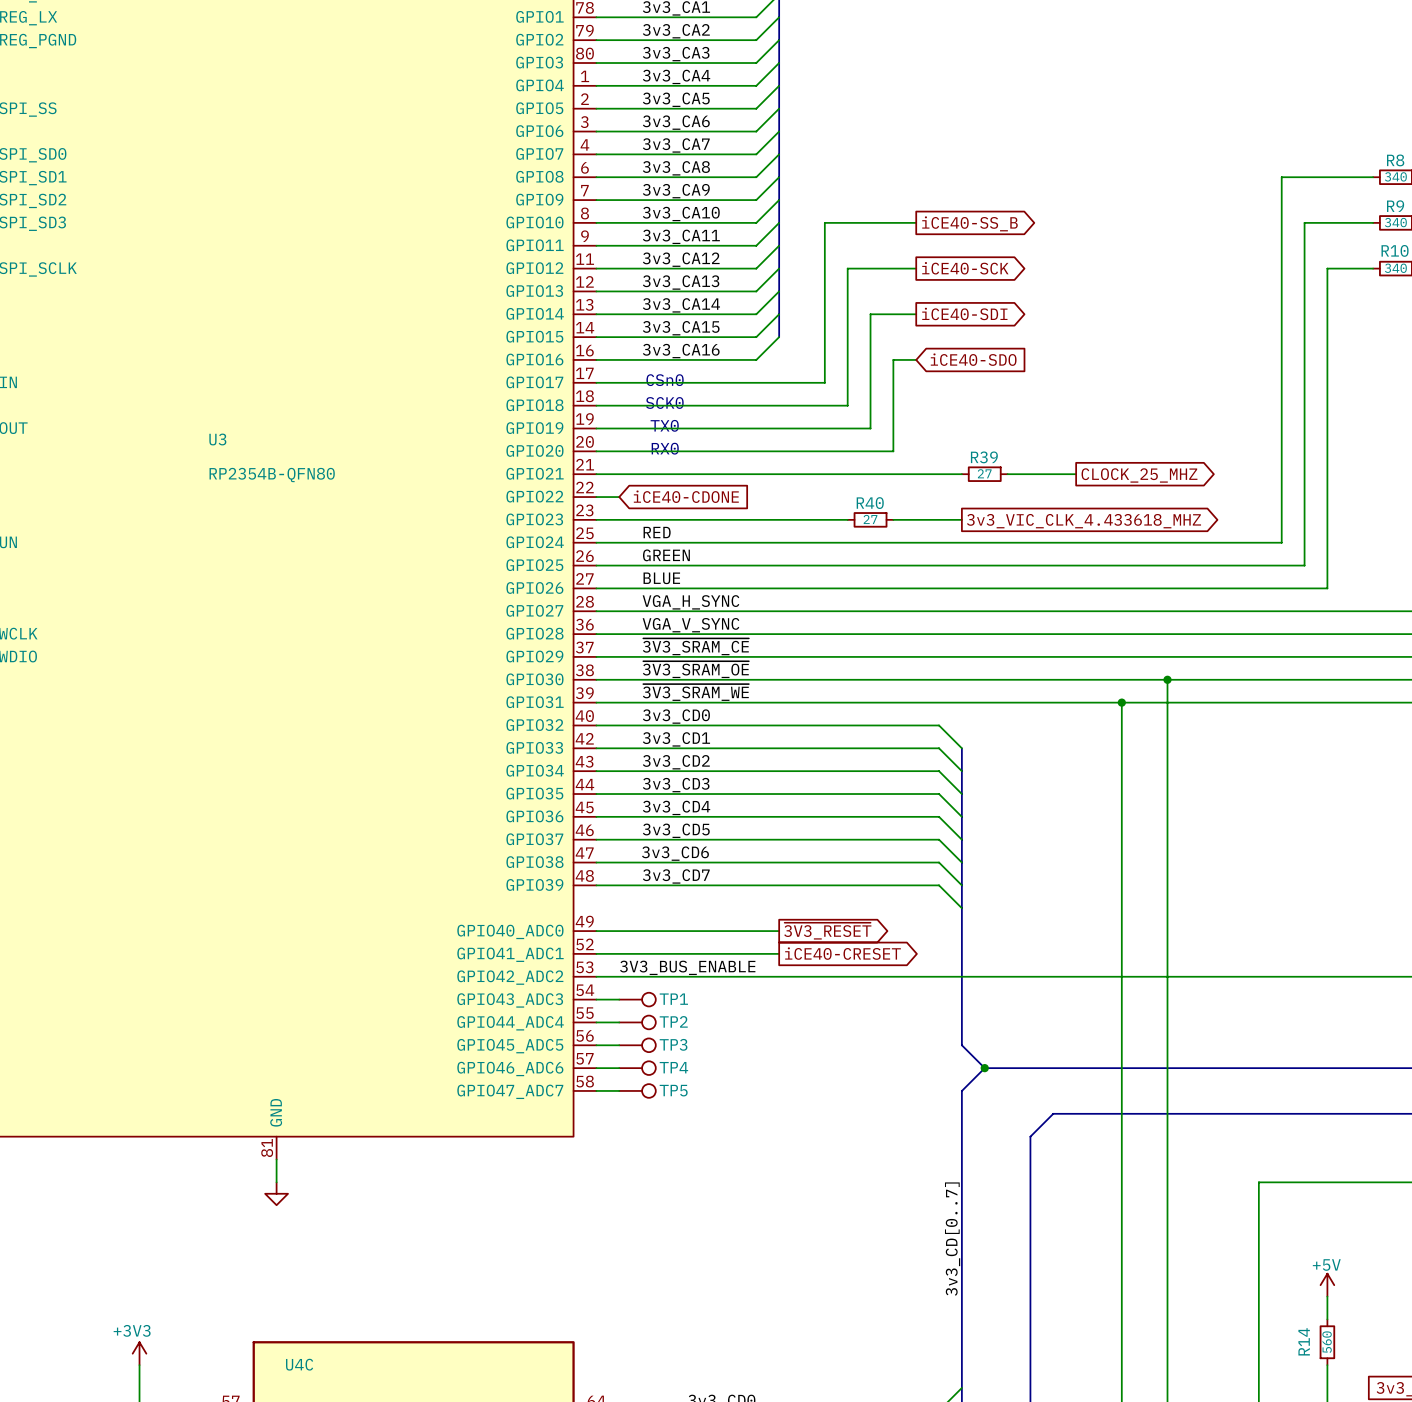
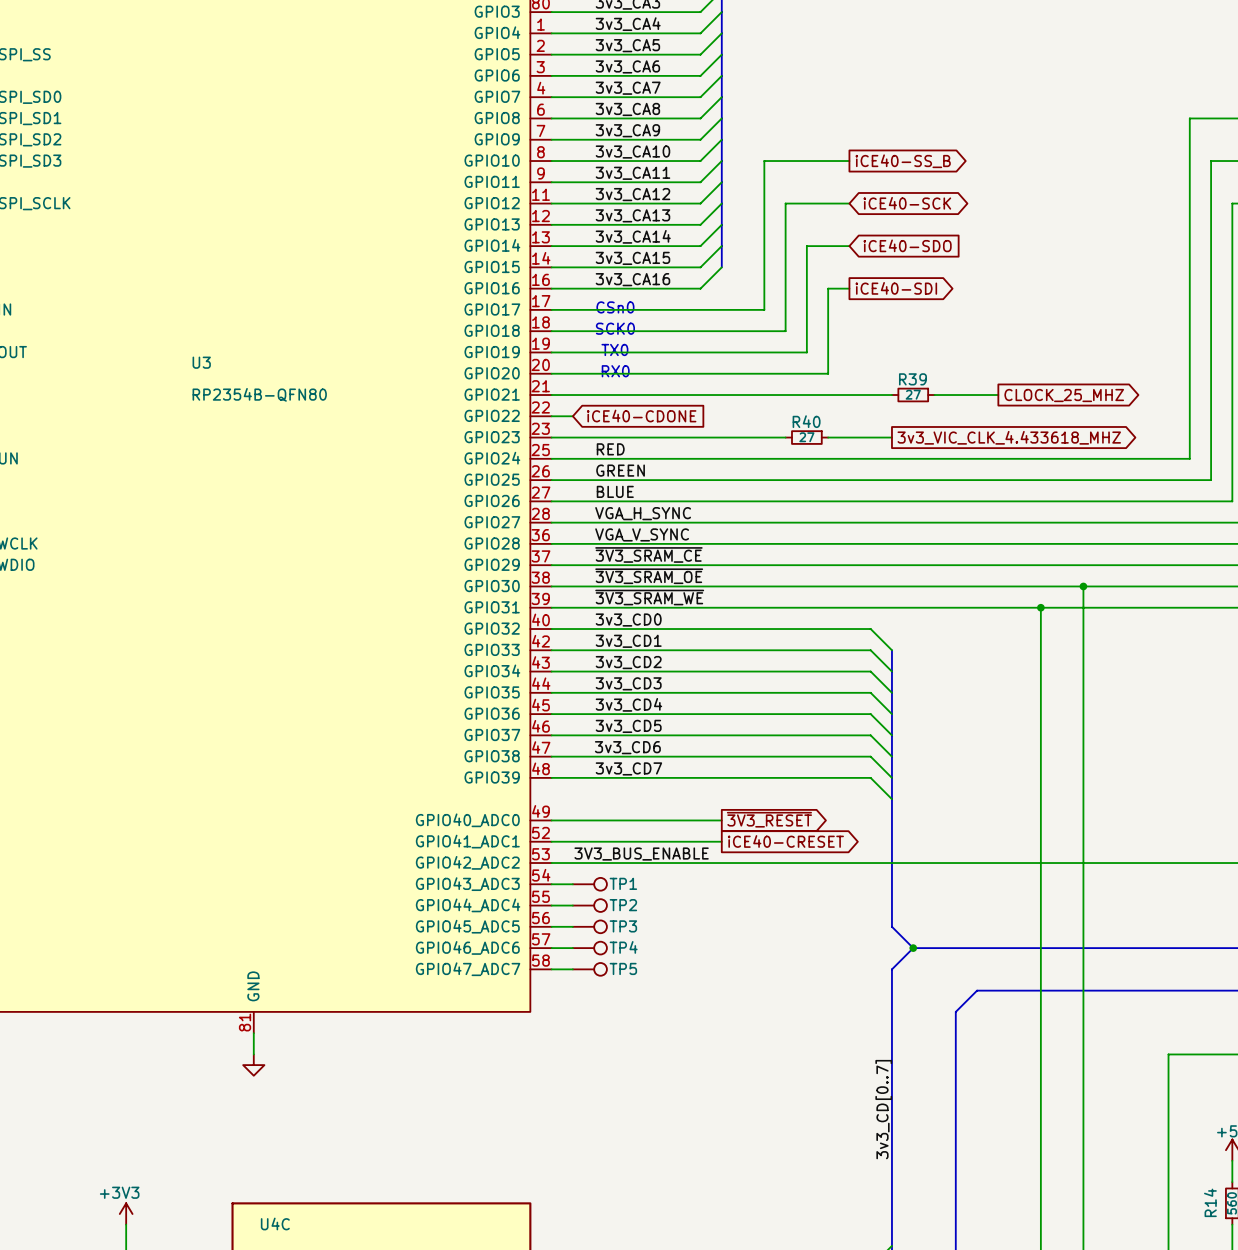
global label shape: output (965, 268) -> bidirectional (907, 203)
global label shape: output (964, 313) -> input (907, 245)
global label: iCE40-SDI (964, 313) -> iCE40-SDO (907, 245)
global label shape: input (973, 359) -> output (896, 288)
global label: iCE40-SDO (973, 359) -> iCE40-SDI (896, 288)

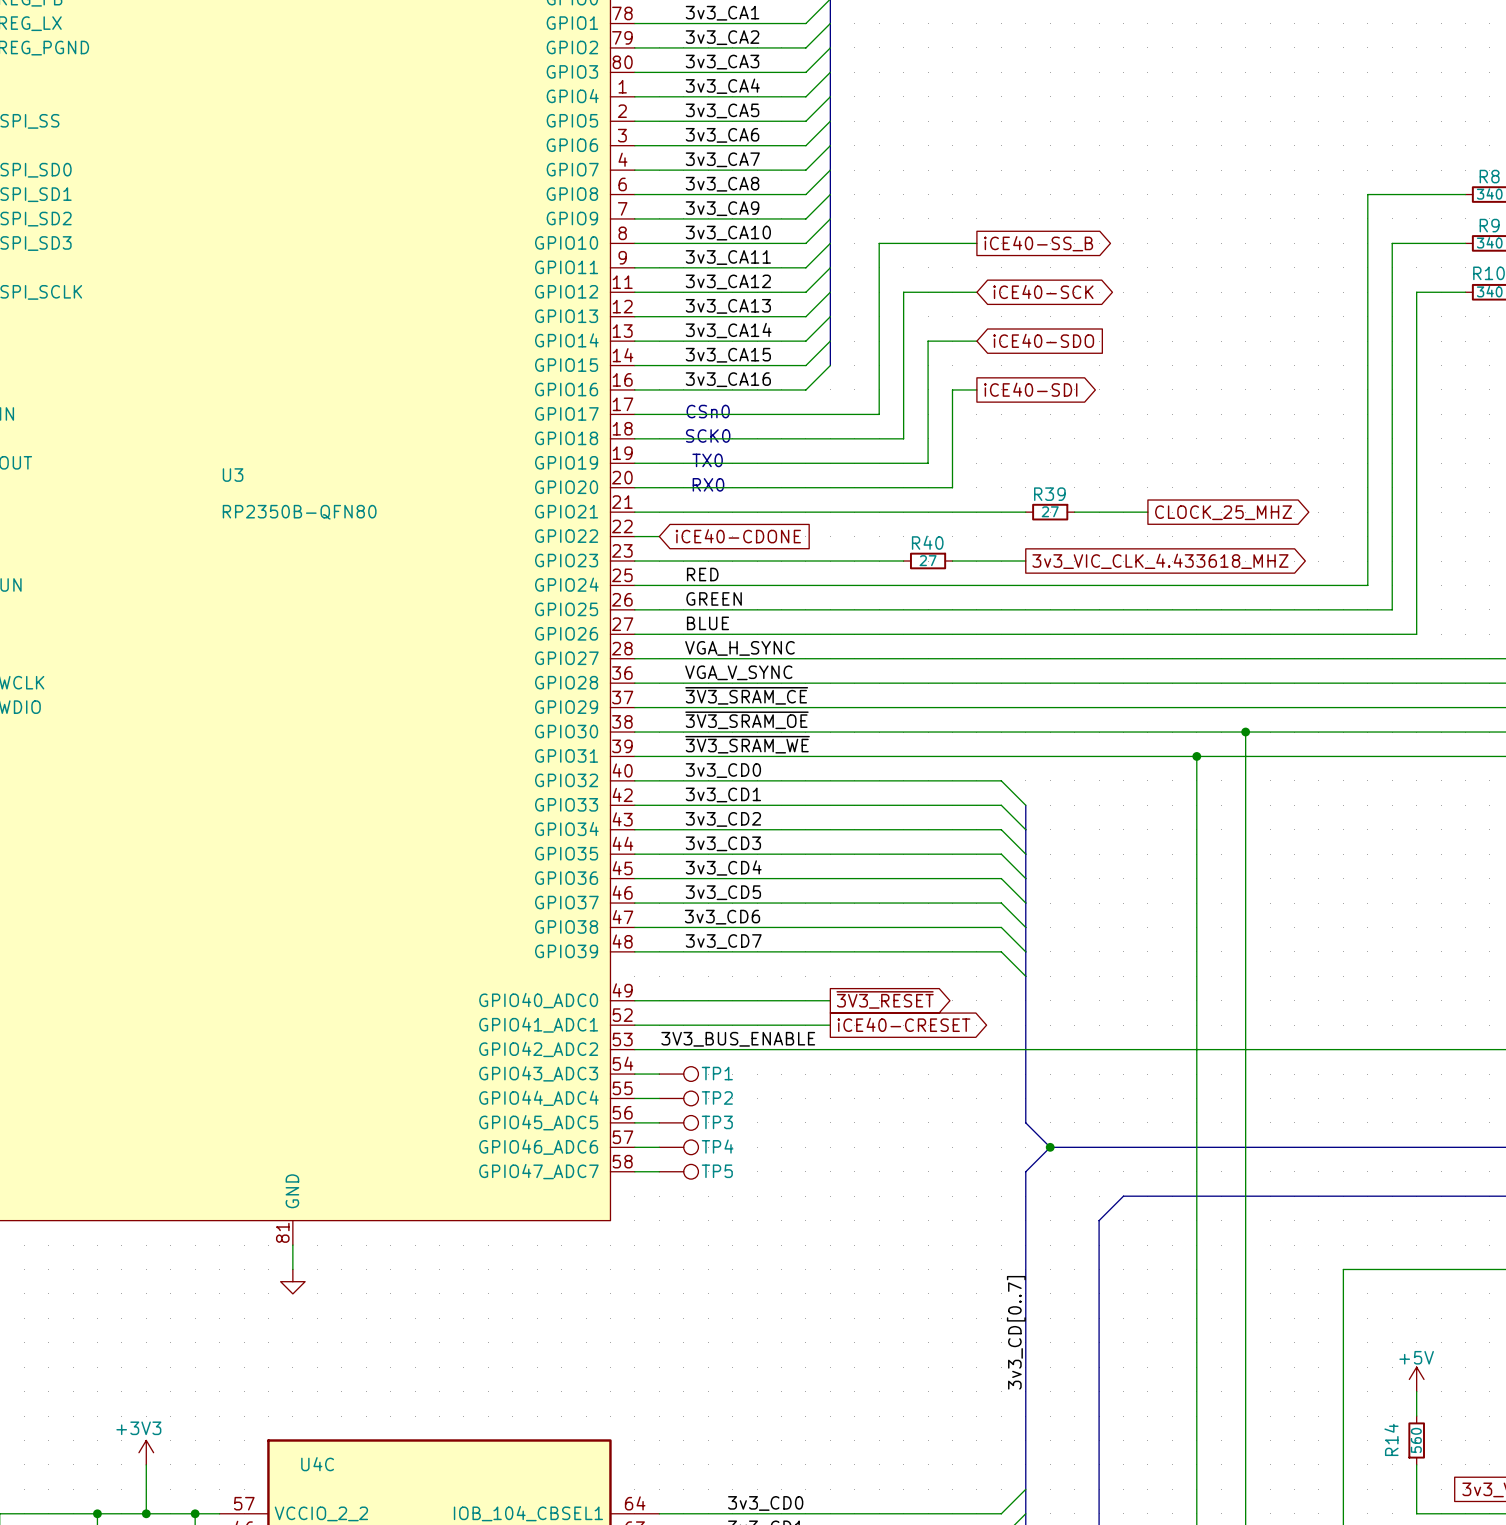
U3 value: RP2354B-QFN80 (259, 394) -> RP2350B-QFN80 (299, 512)

